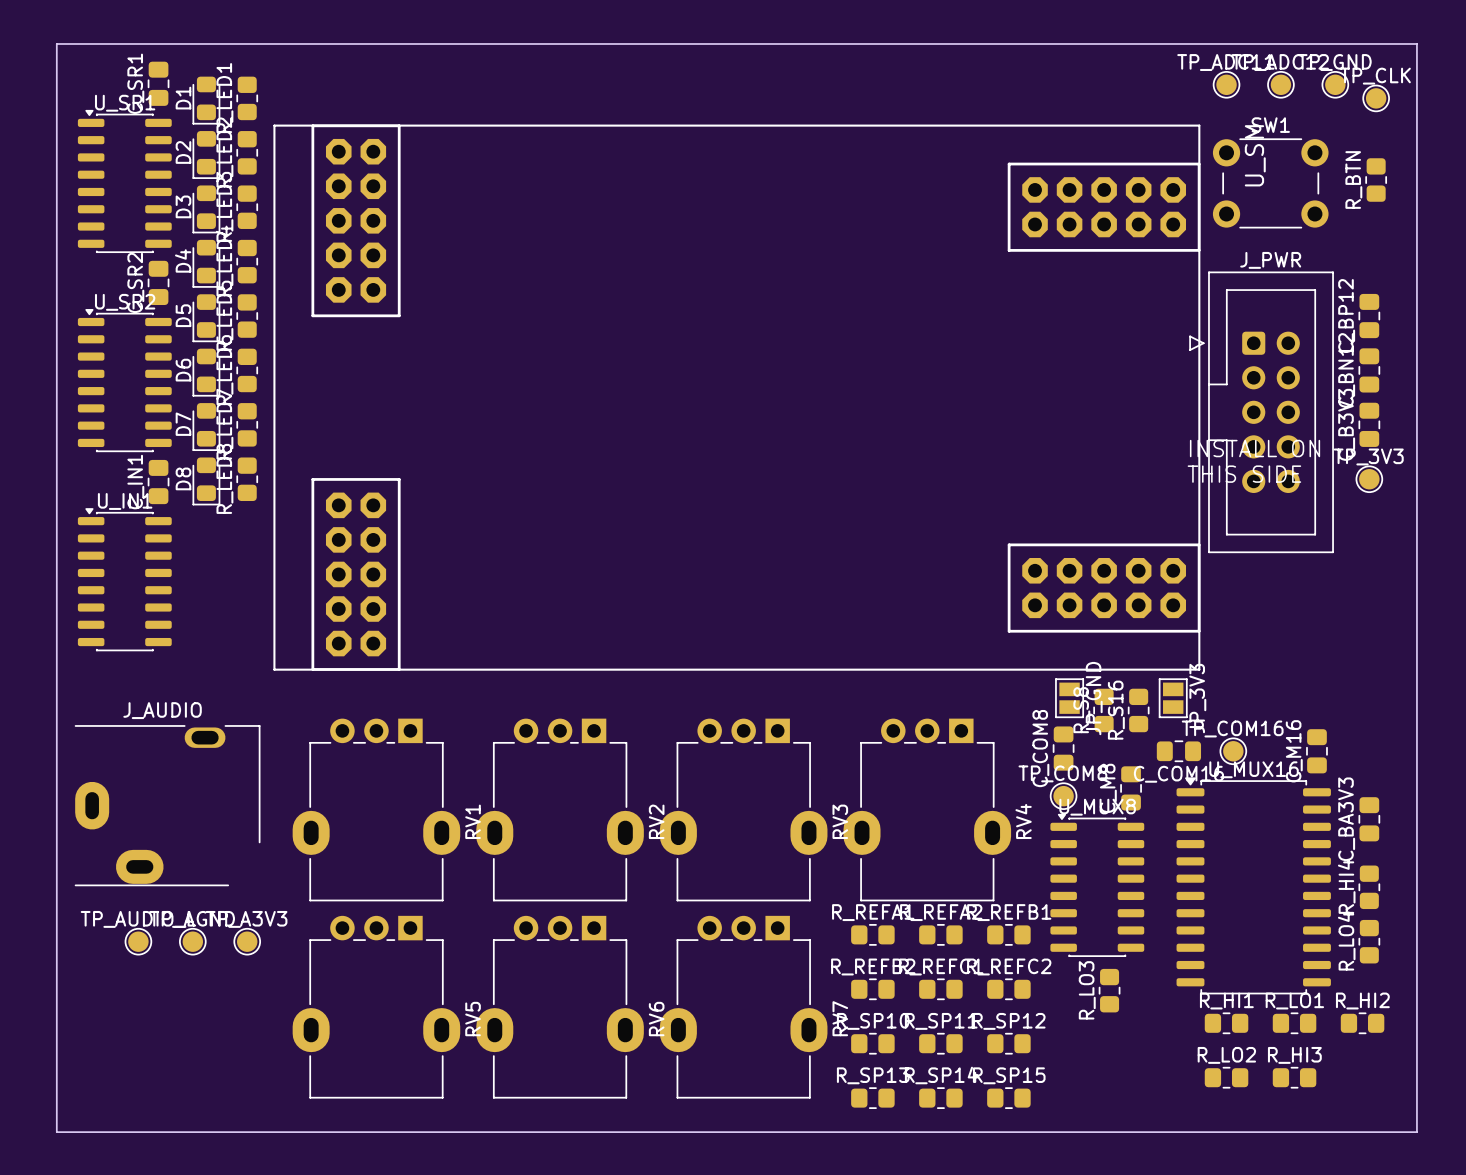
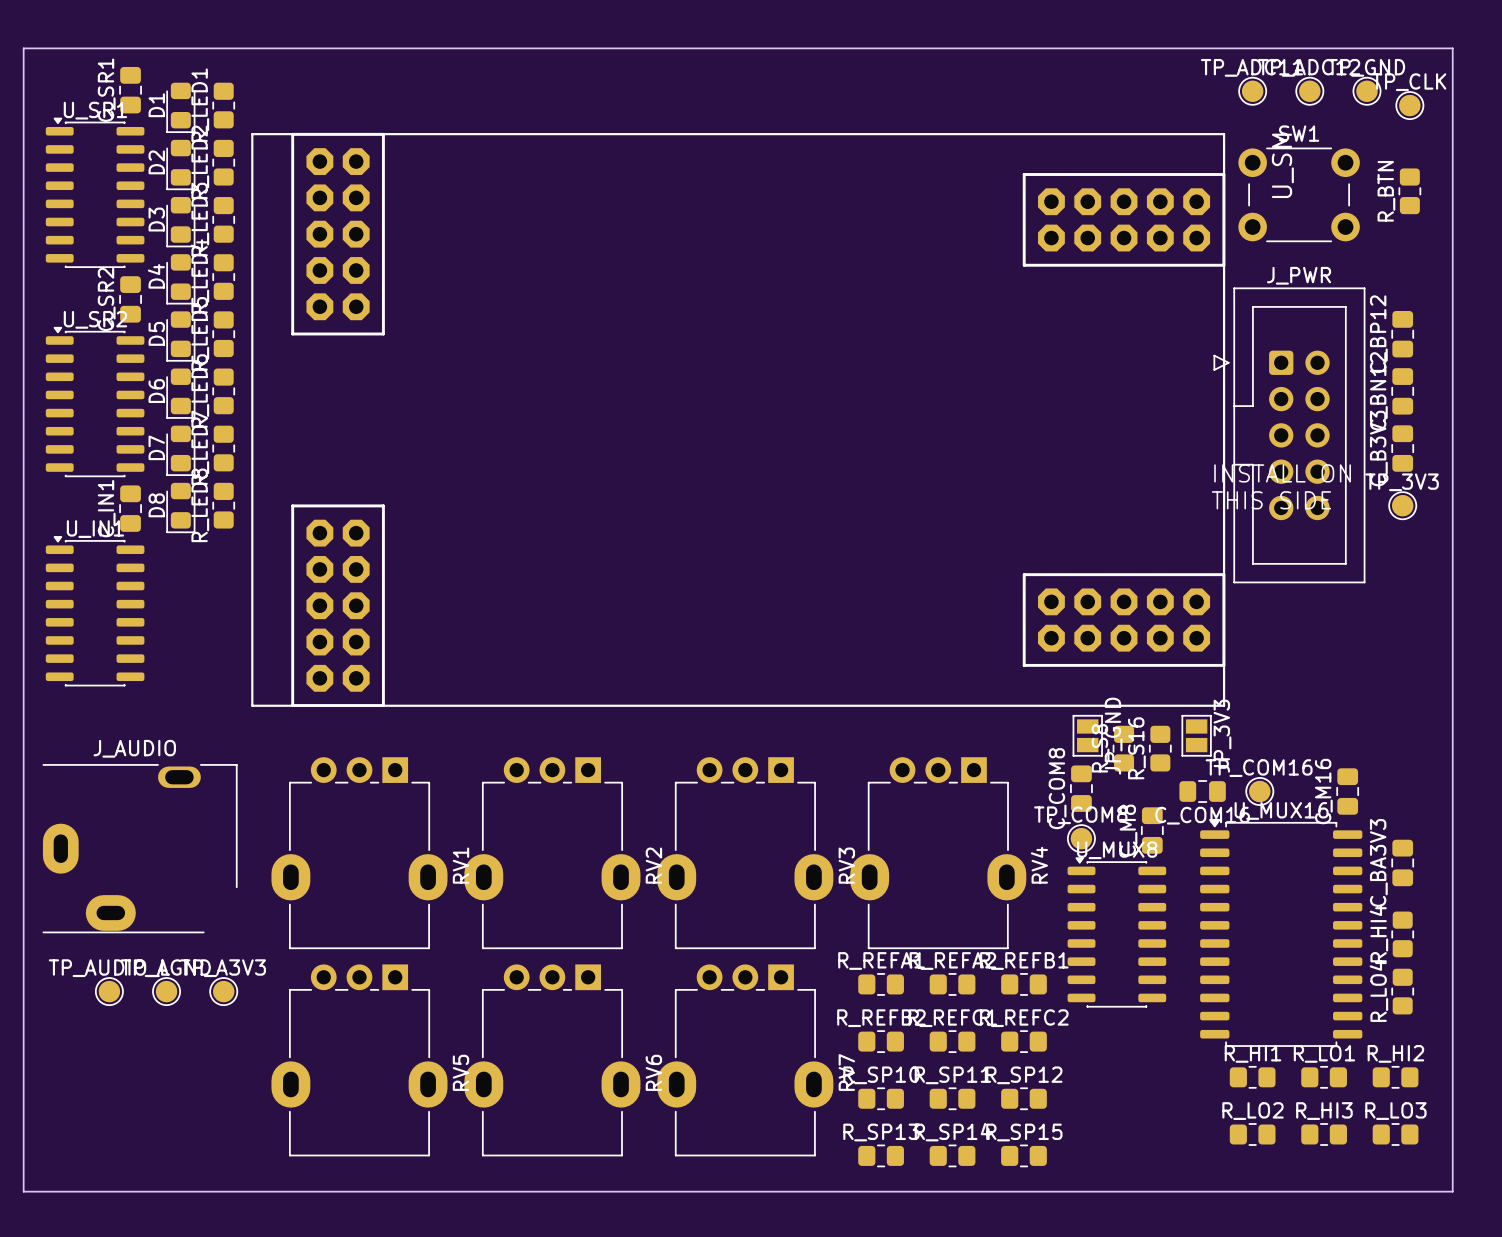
R_LO3 rotation: 0° (1109, 990) -> 90° clockwise (1395, 1134)
R_LO3 position: (1109, 990) -> (1395, 1134)

